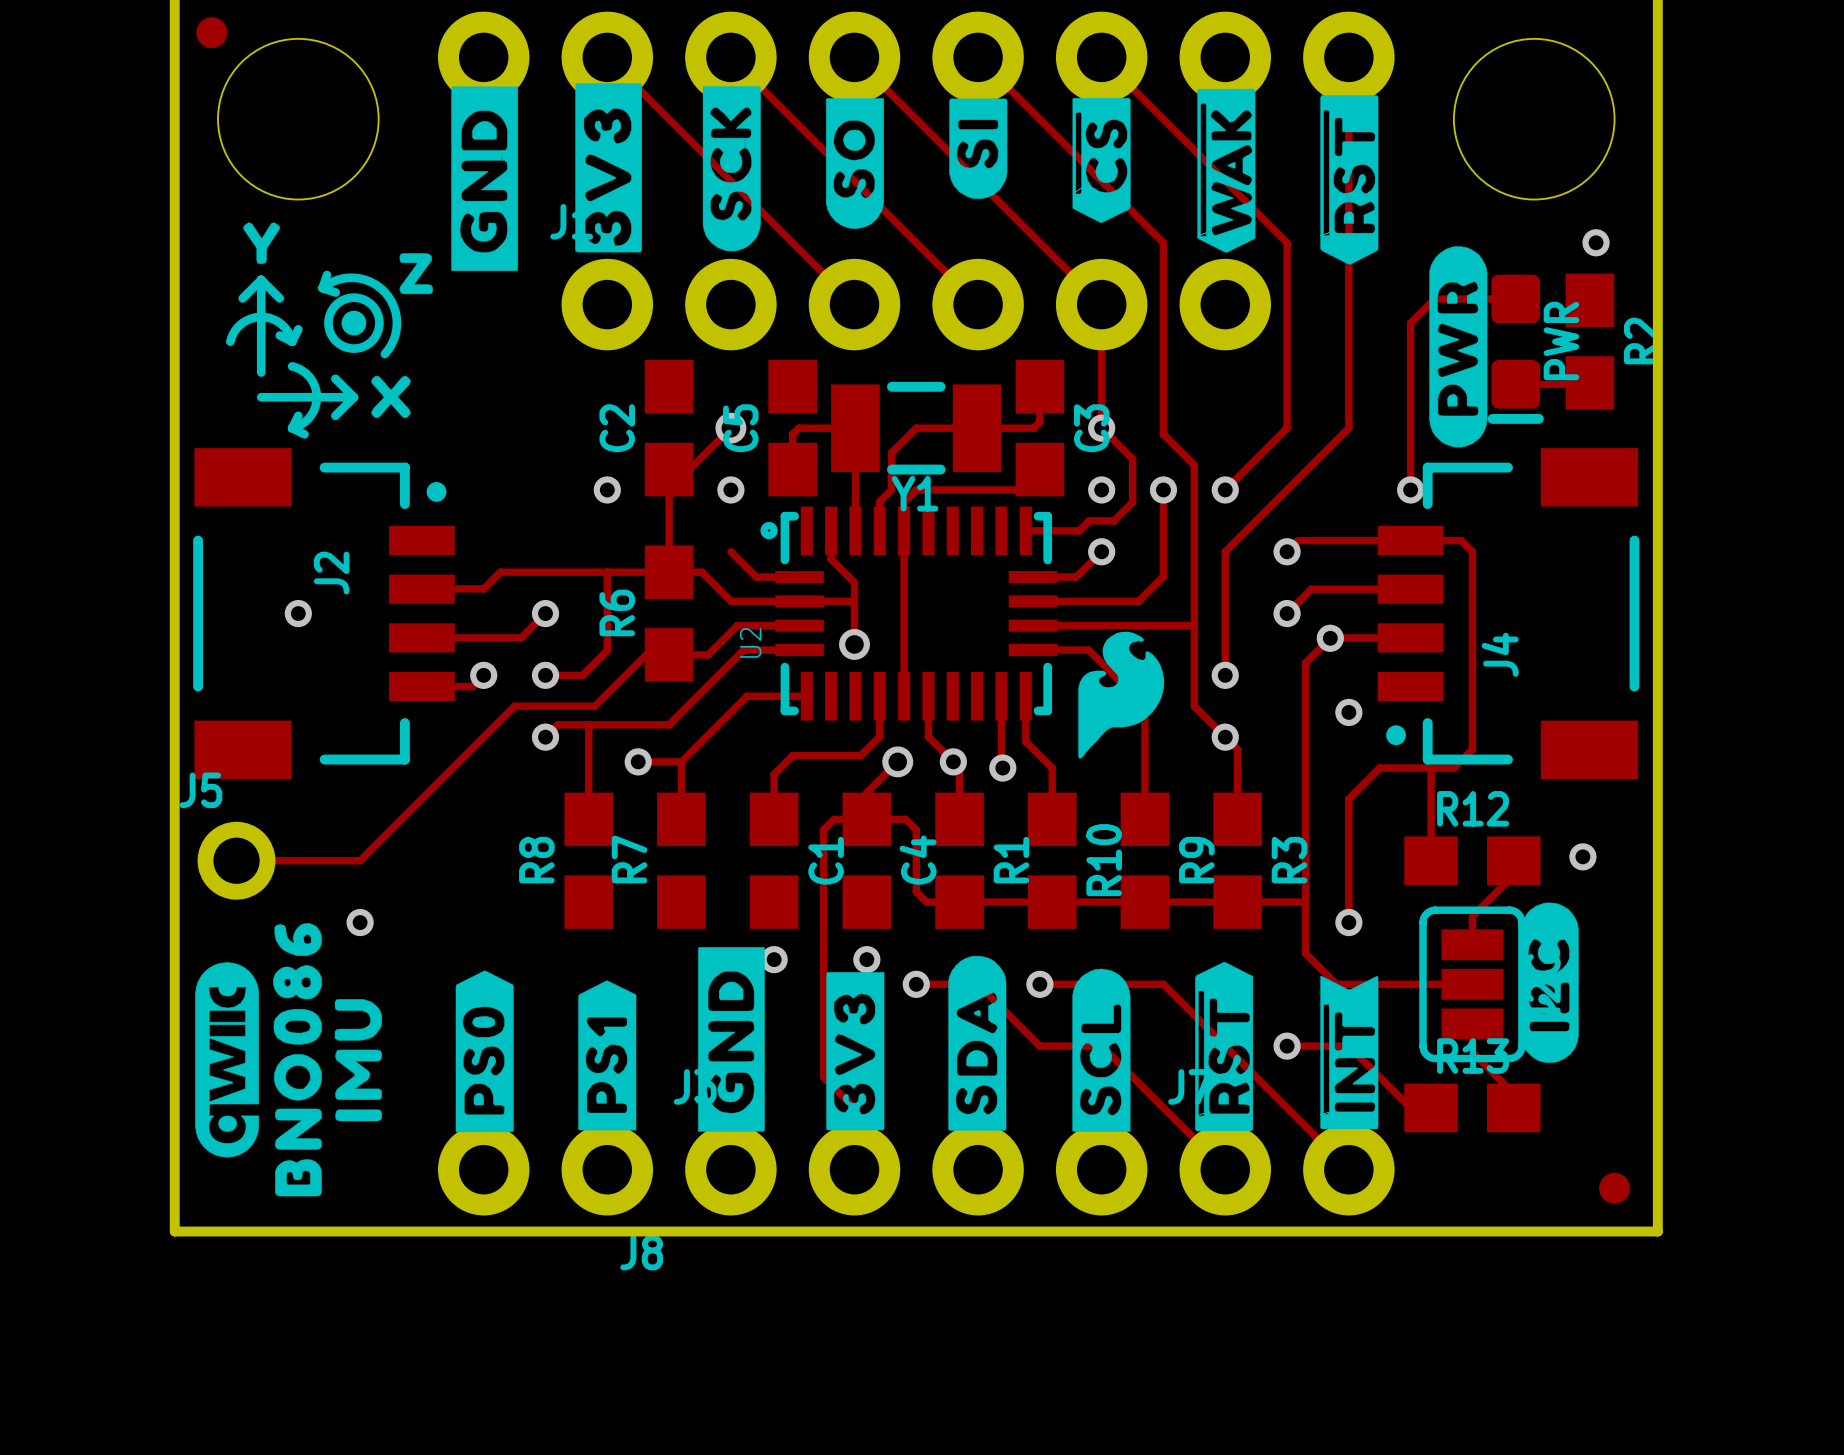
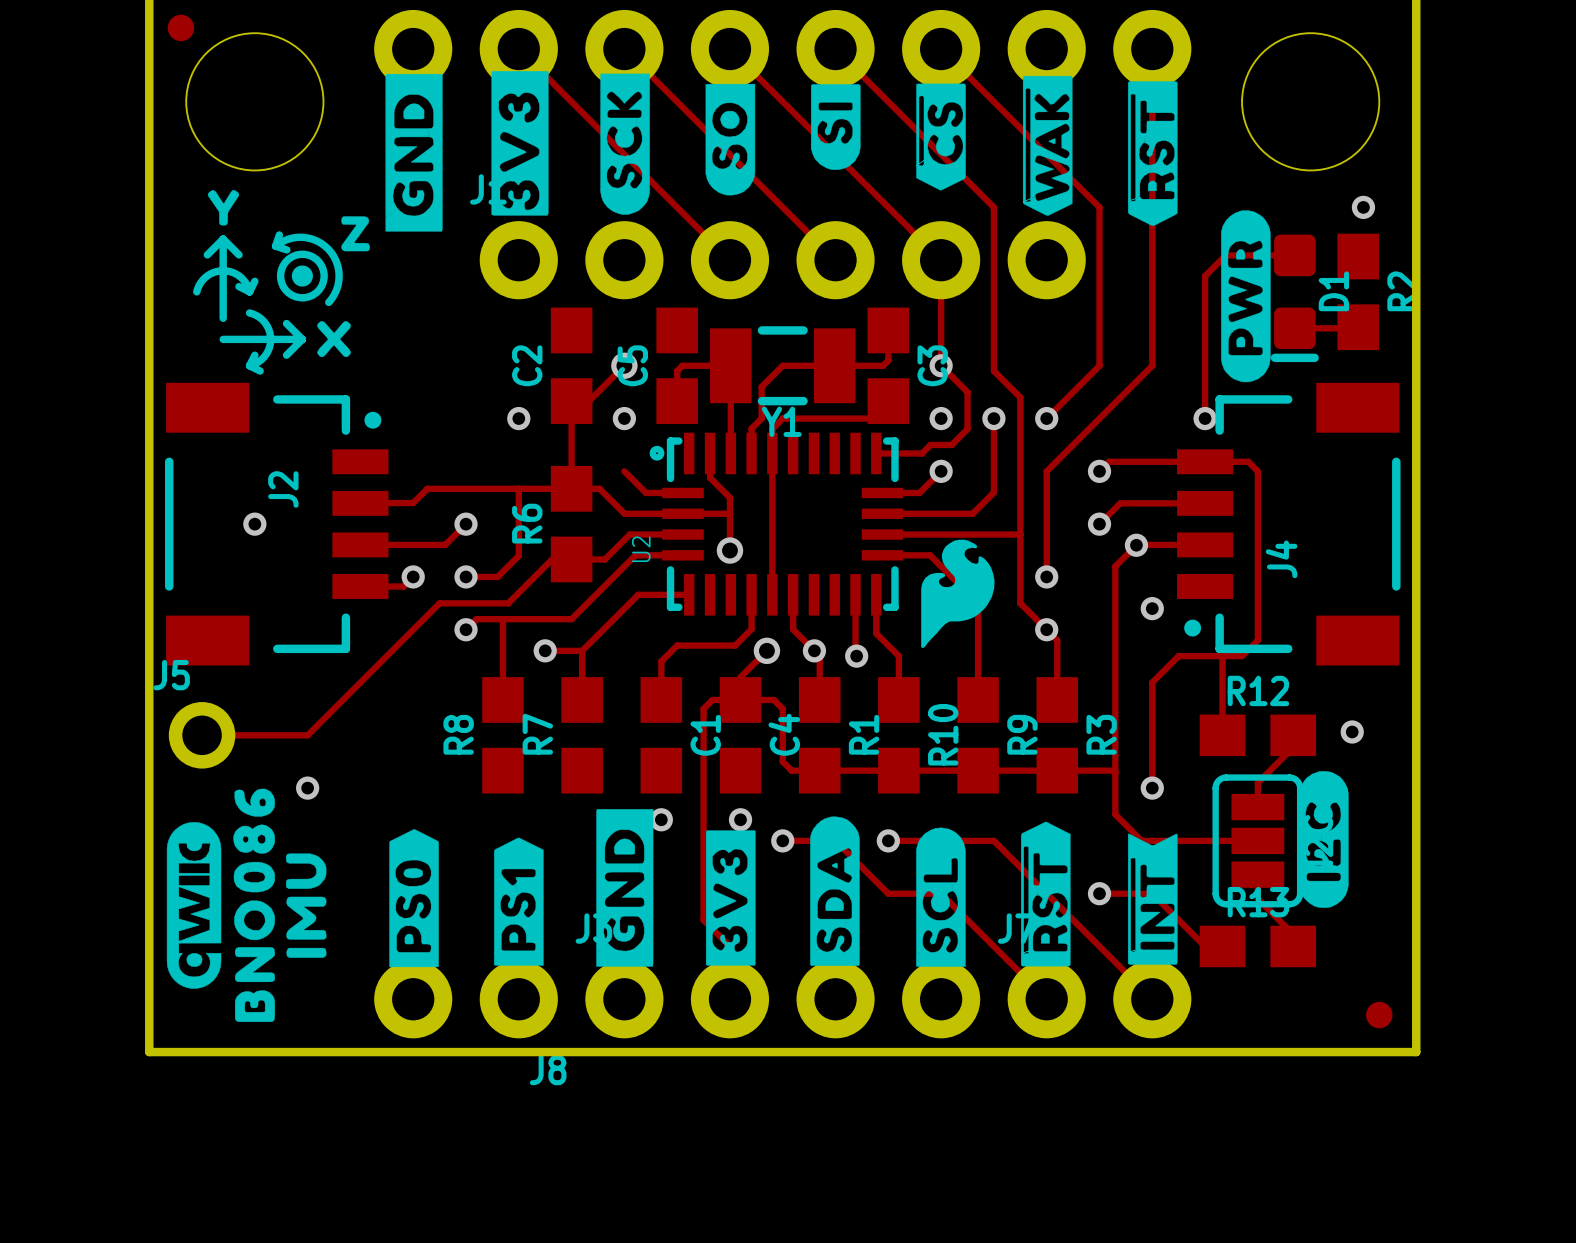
PWR name: PWR (1561, 341) -> D1 (1333, 291)

